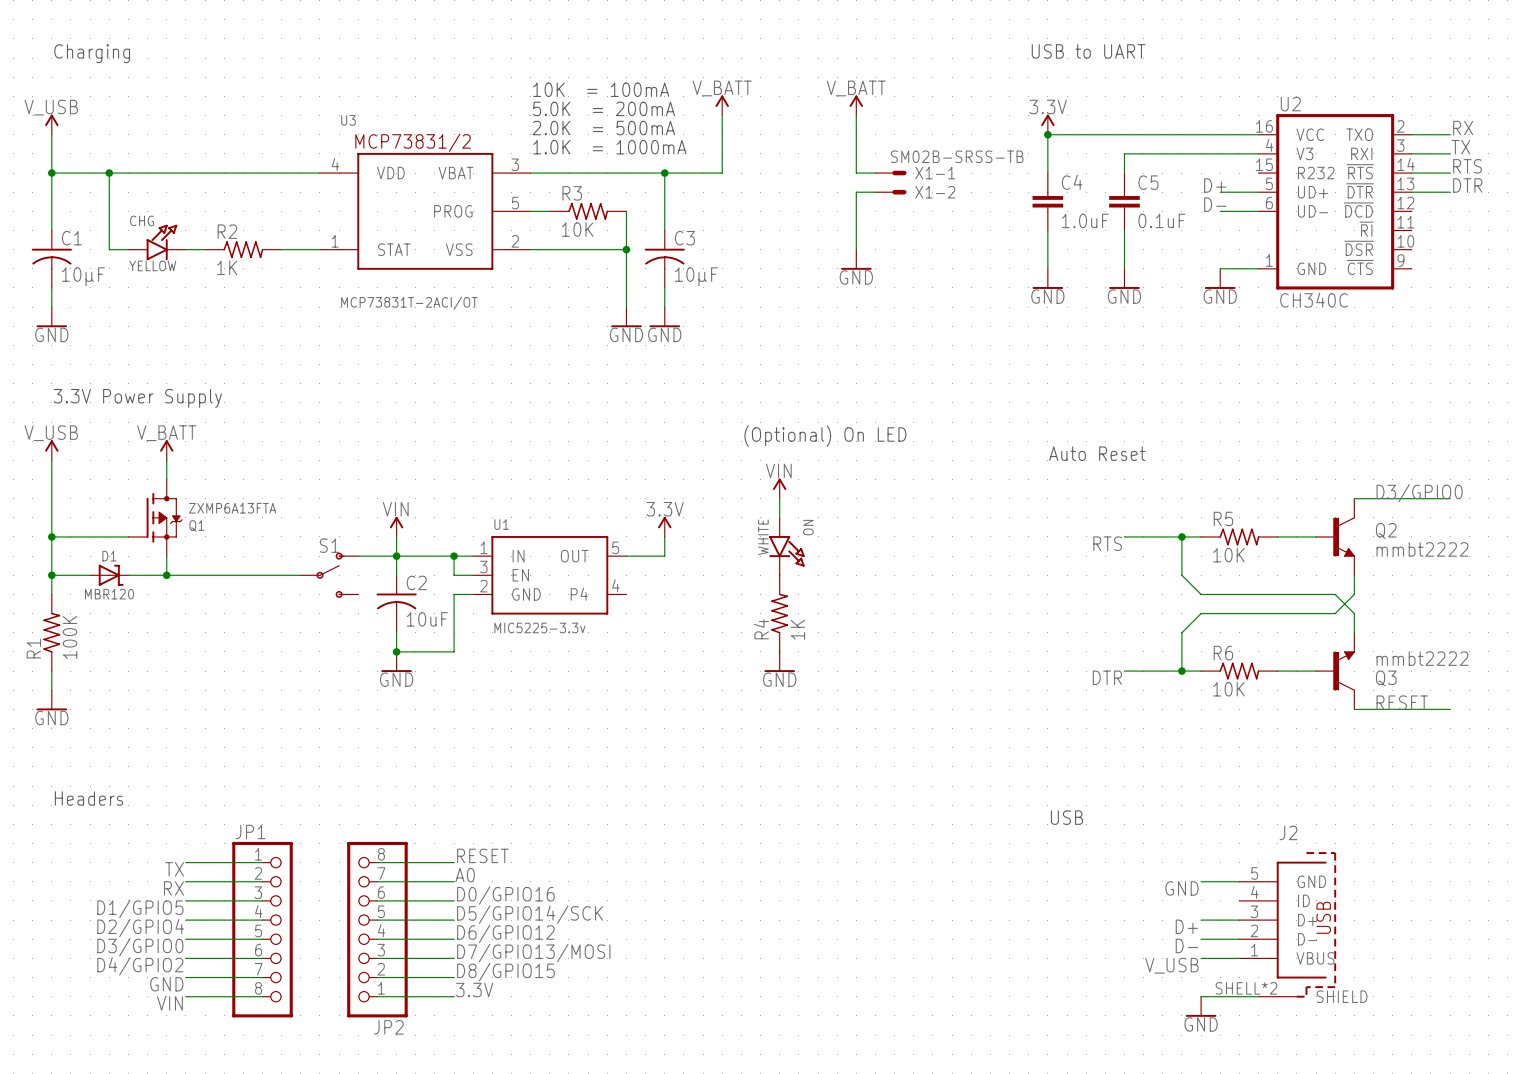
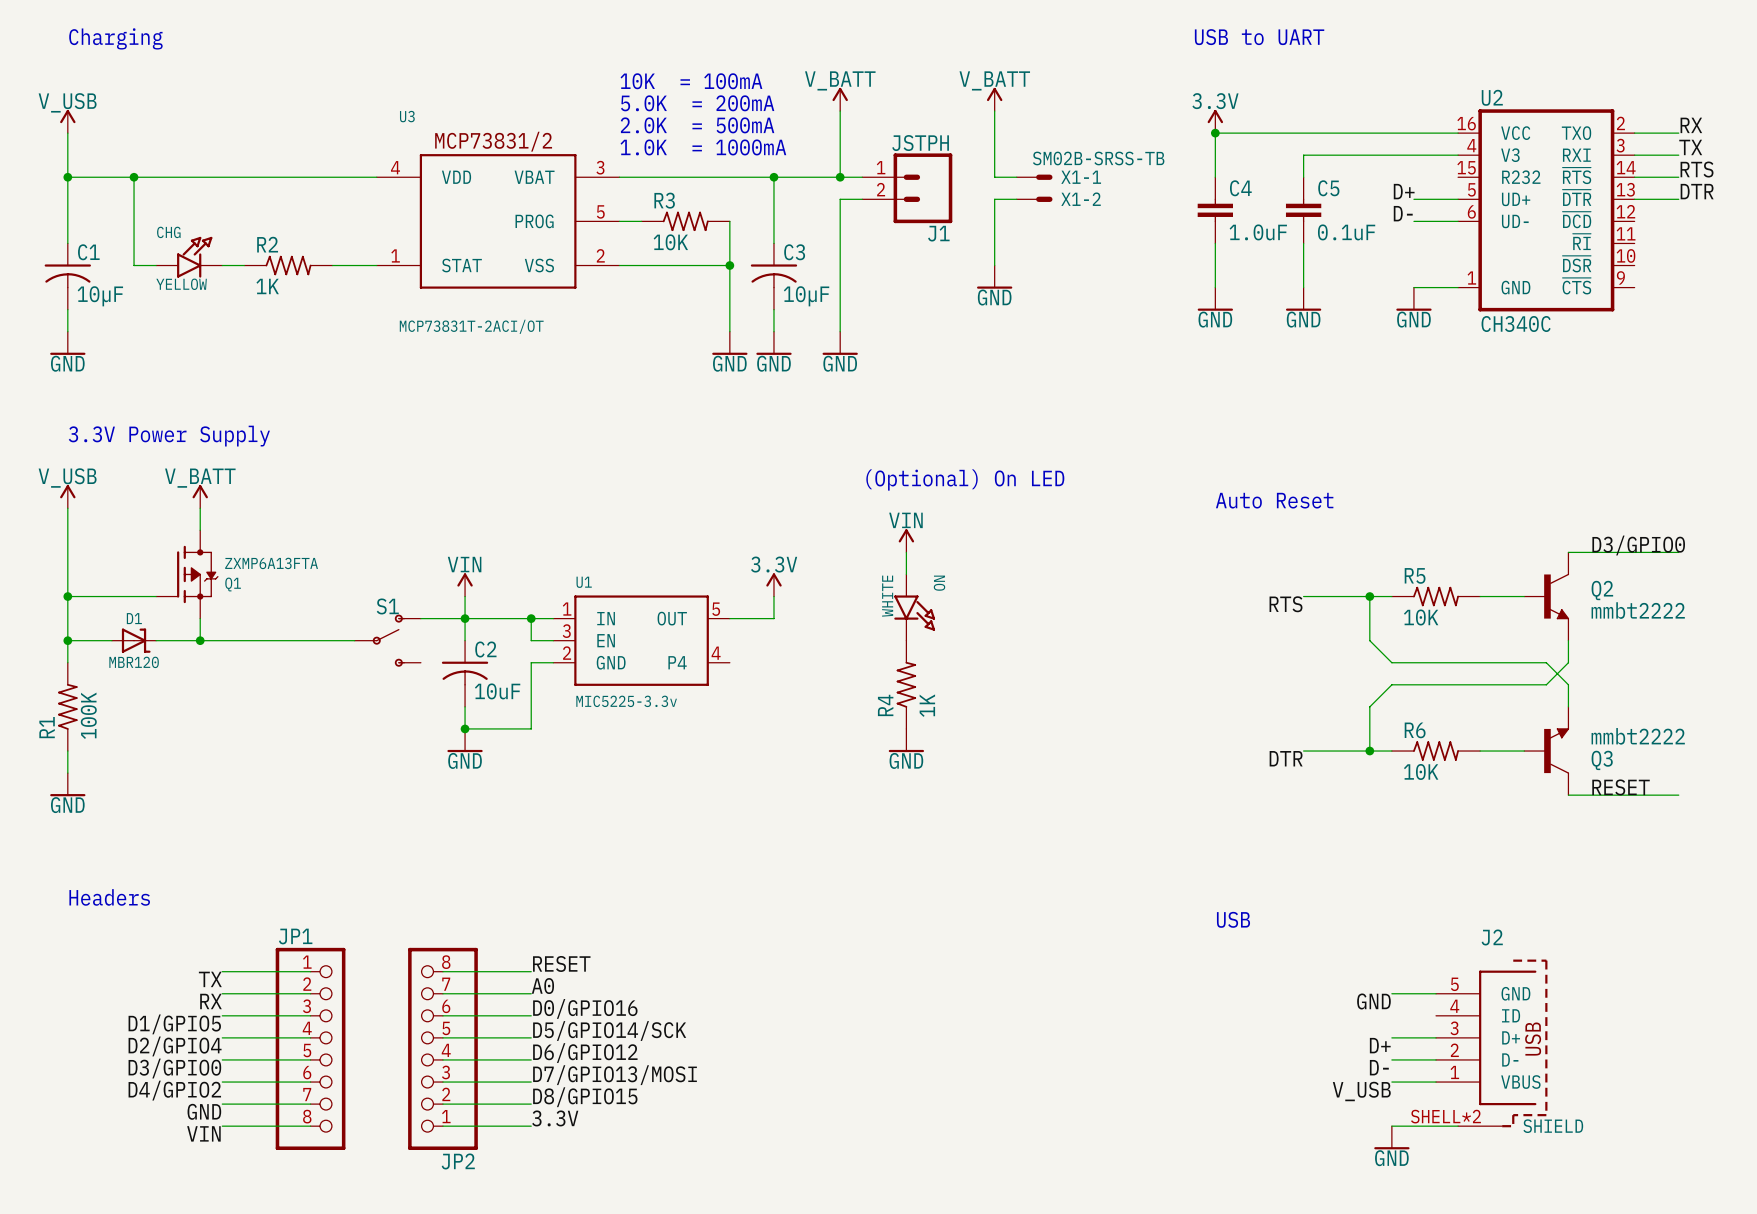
wire: none -> (840, 177) (862, 177)
junction: none -> (840, 177)
J1: none -> JSTPH (907, 188)
wire: none -> (862, 199) (840, 199) (840, 331)
power symbol: none -> GND (840, 343)

